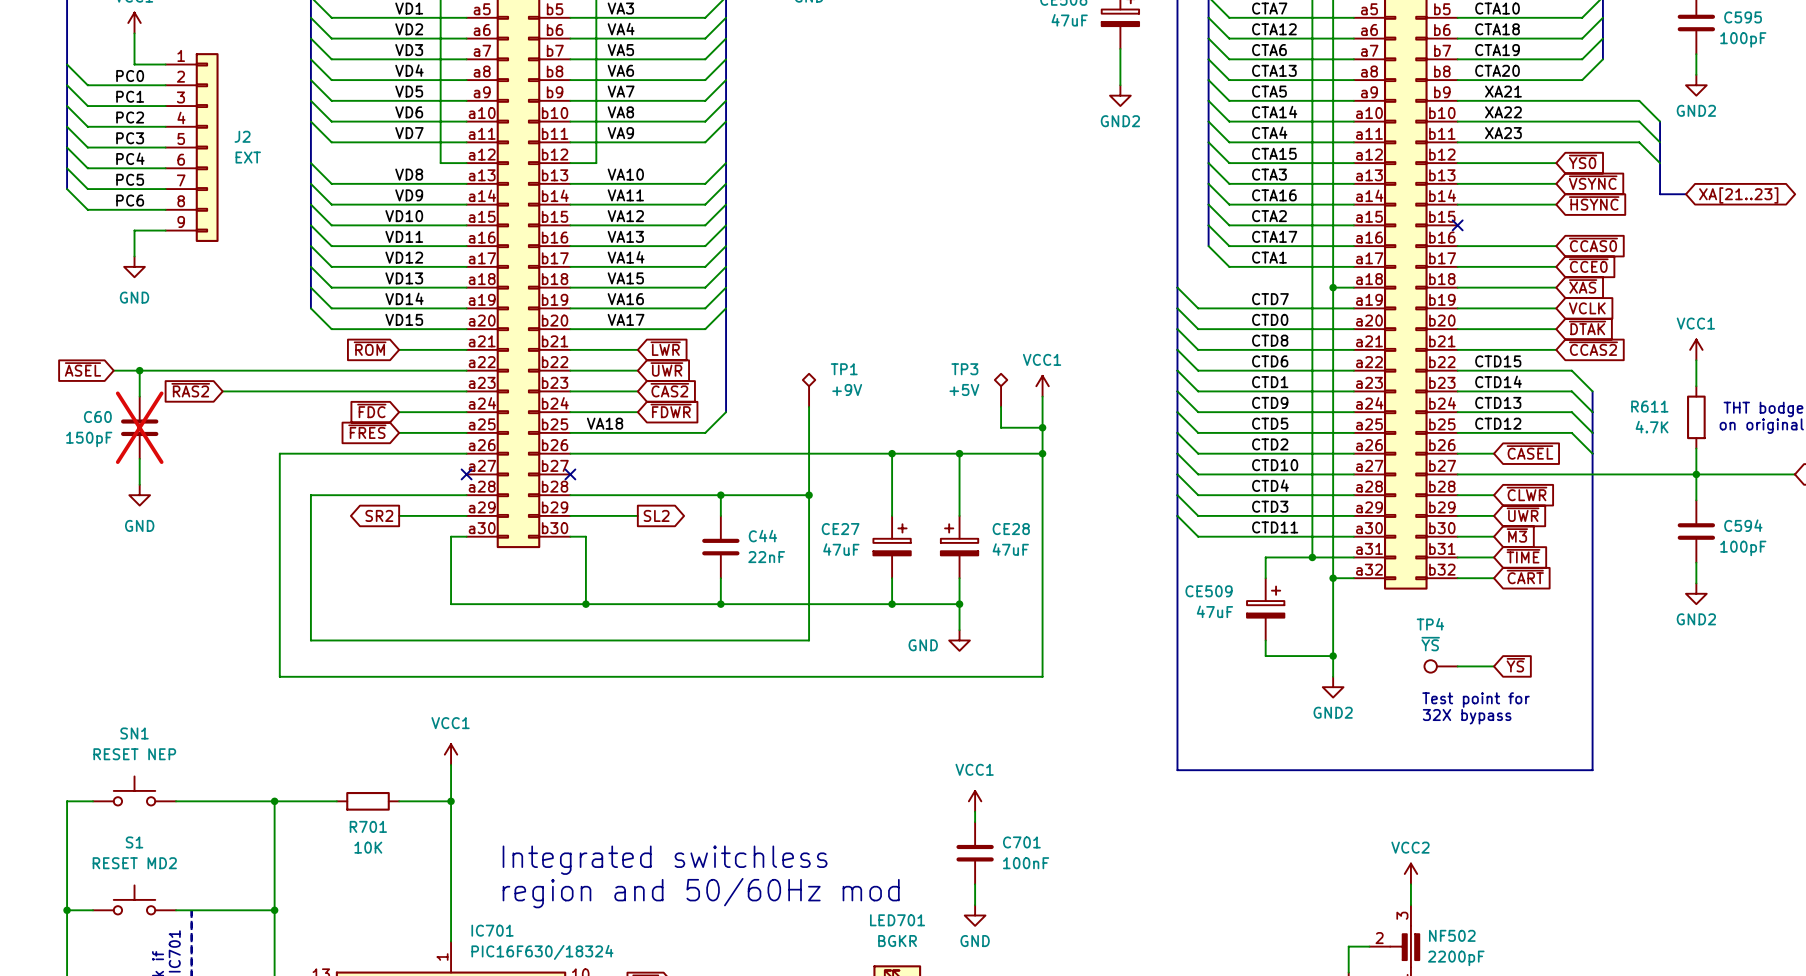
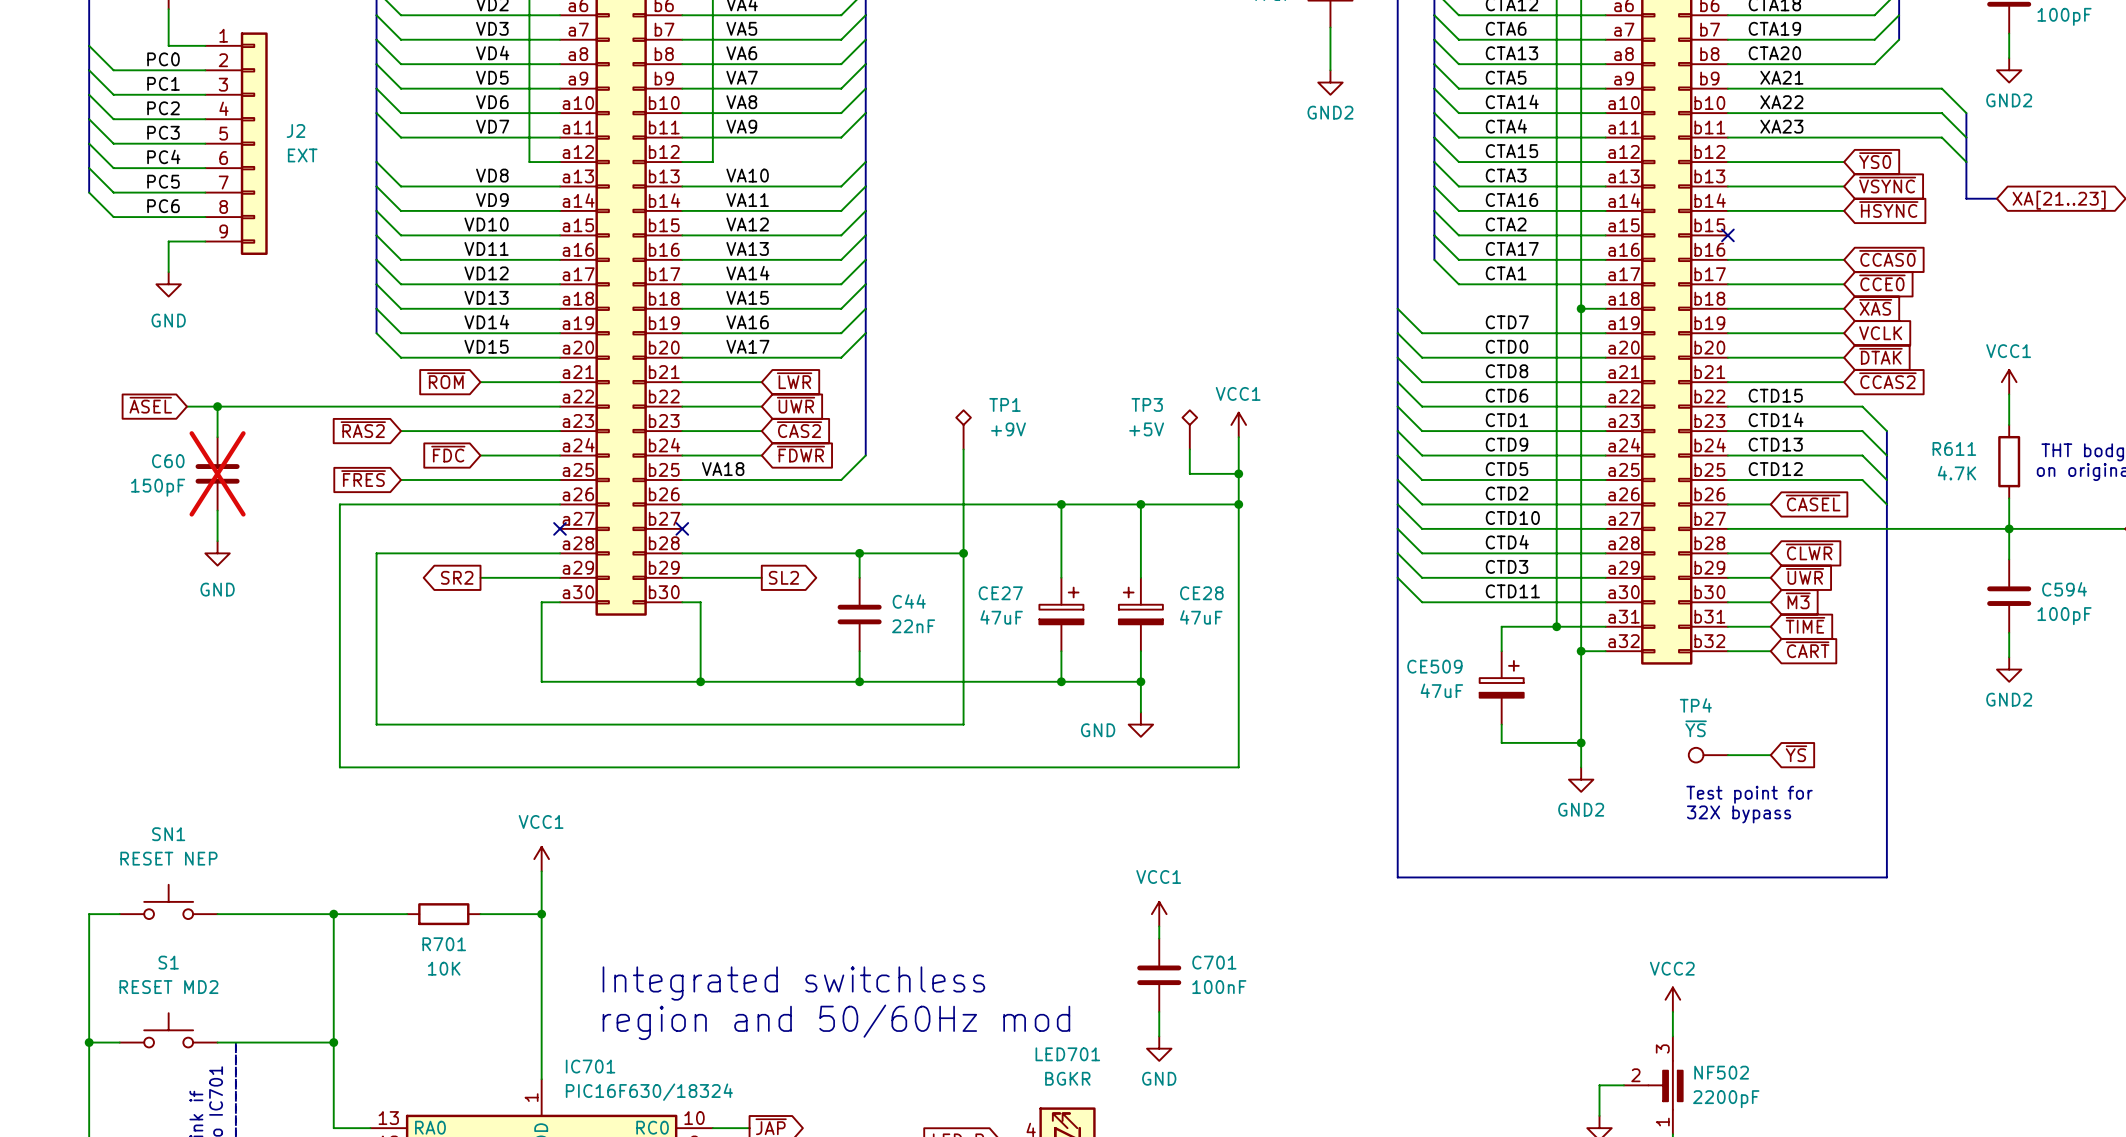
global label position: ~{ASEL} (82, 369) -> ~{ASEL} (150, 405)
wire: (113, 370) (150, 370) -> none
wire: (139, 370) (139, 396) -> (217, 406) (217, 437)
junction position: (139, 370) -> (217, 406)
global label position: ~{RAS2} (190, 390) -> ~{RAS2} (363, 429)
wire: (222, 391) (331, 391) -> none
C60 position: (139, 427) -> (217, 473)
global label position: ~{FRES} (367, 431) -> ~{FRES} (363, 478)
wire: none -> (401, 479) (480, 479)
wire: (139, 458) (139, 484) -> (217, 510) (217, 541)
power symbol position: GND (139, 495) -> GND (217, 553)

